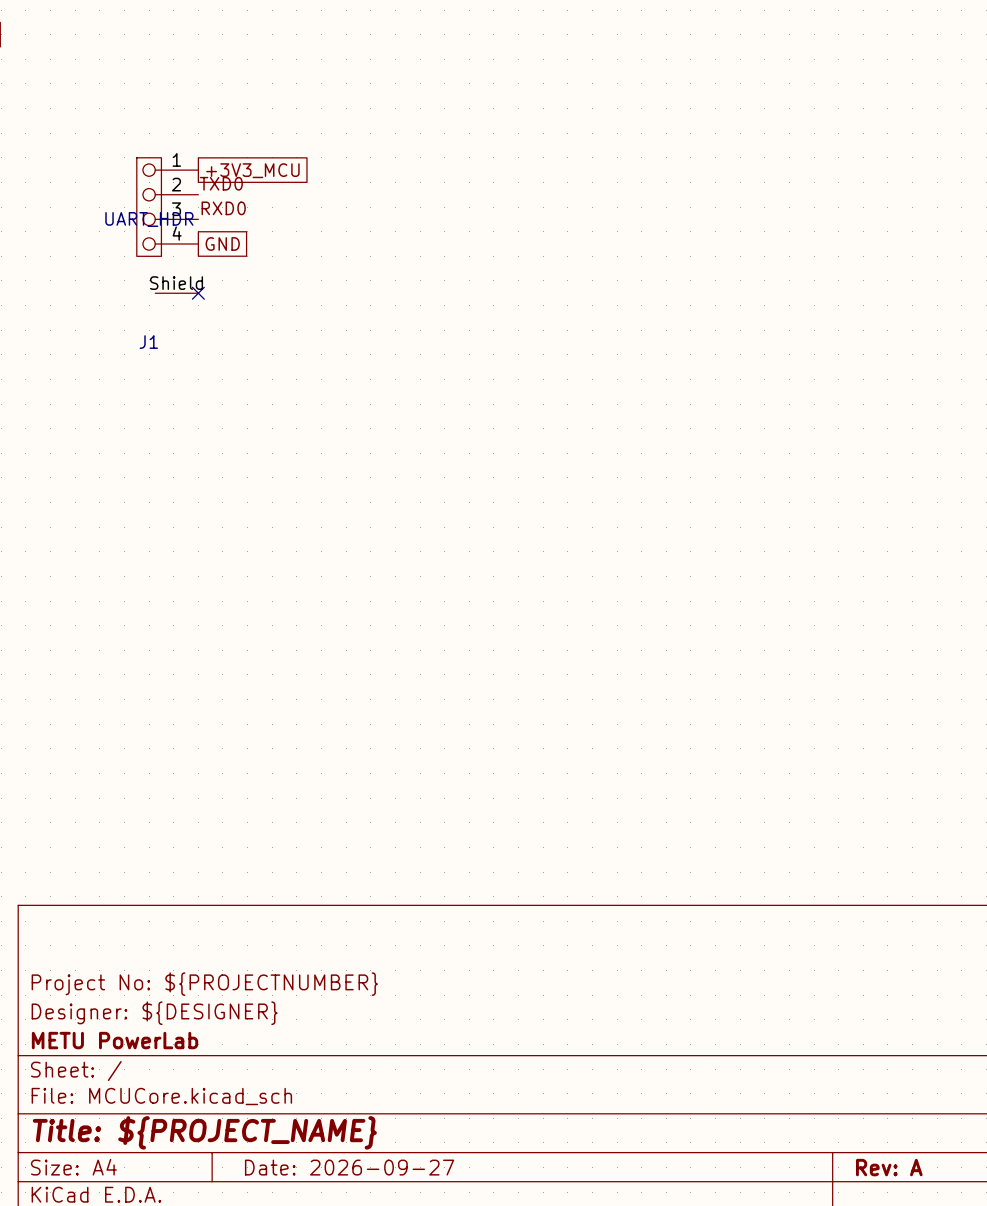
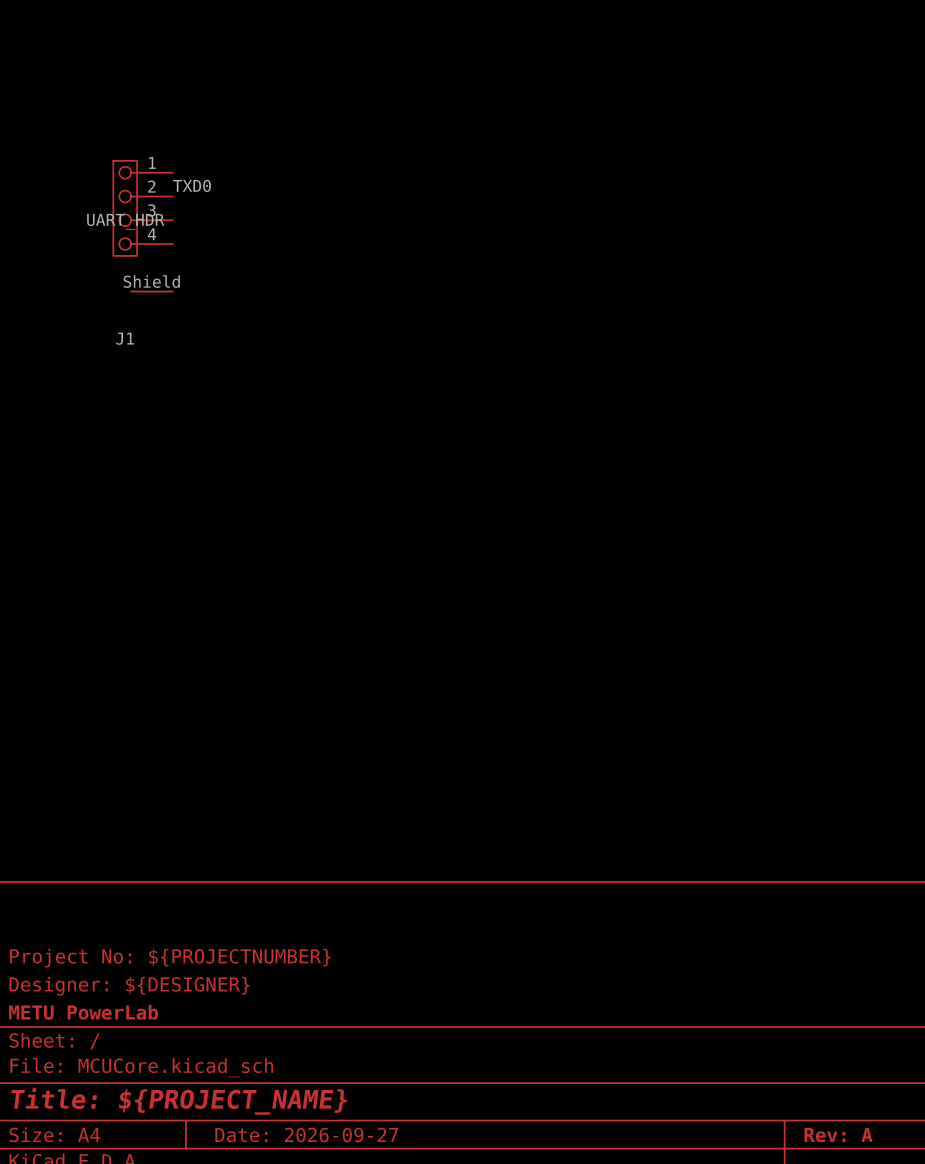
global label: +3V3_MCU (252, 170) -> none
label: RXD0 (223, 208) -> none
global label: GND (222, 243) -> none
no-connect mark: (198, 293) -> none

